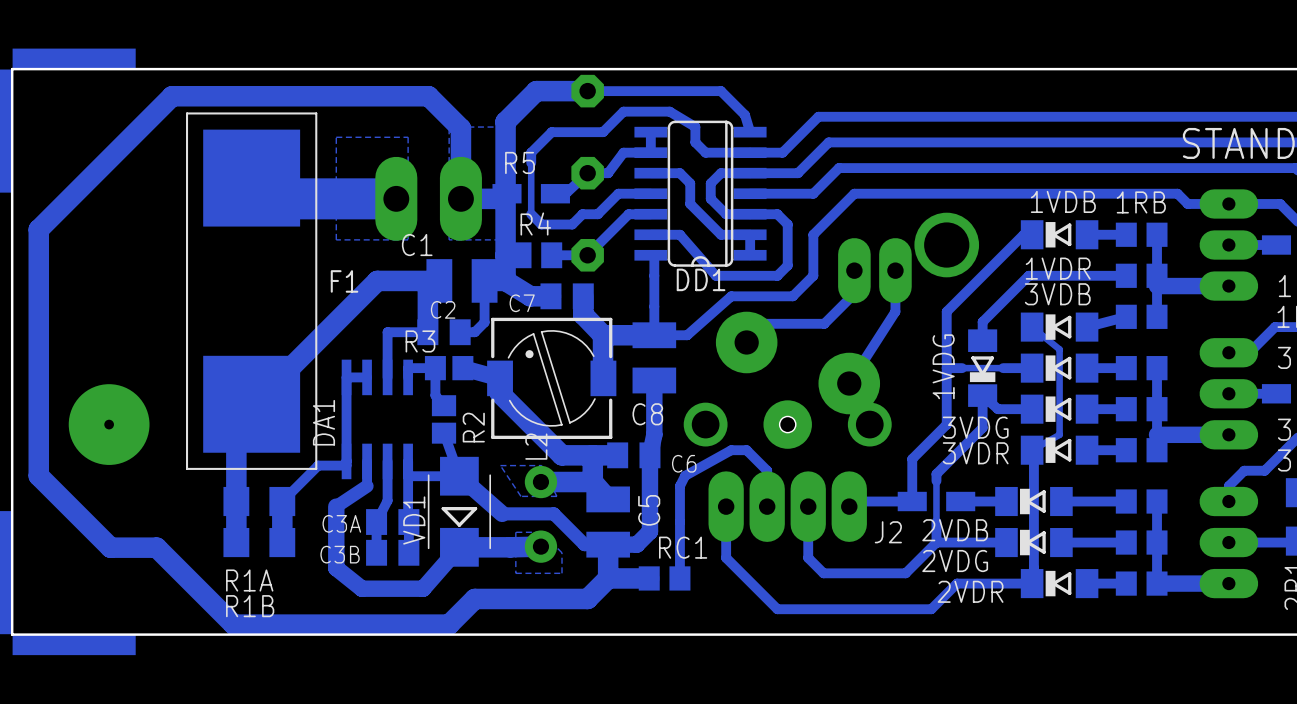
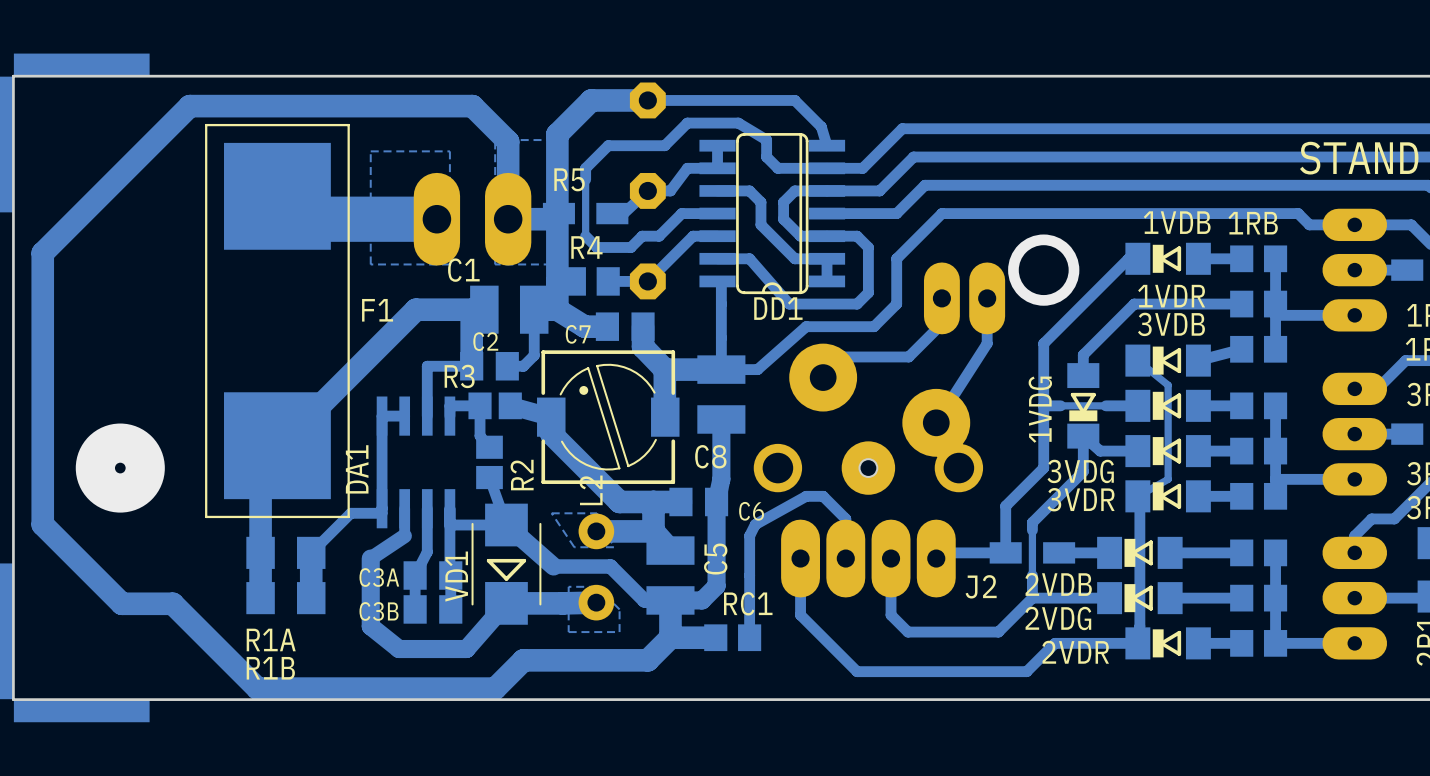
bottom track width: thick (1228, 286) (1157, 286) -> thin (1354, 315) (1275, 315)
bottom track width: thick (1228, 434) (1157, 434) -> thin (1354, 479) (1275, 479)
bottom track width: thick (1228, 583) (1157, 583) -> thin (1354, 643) (1275, 643)

